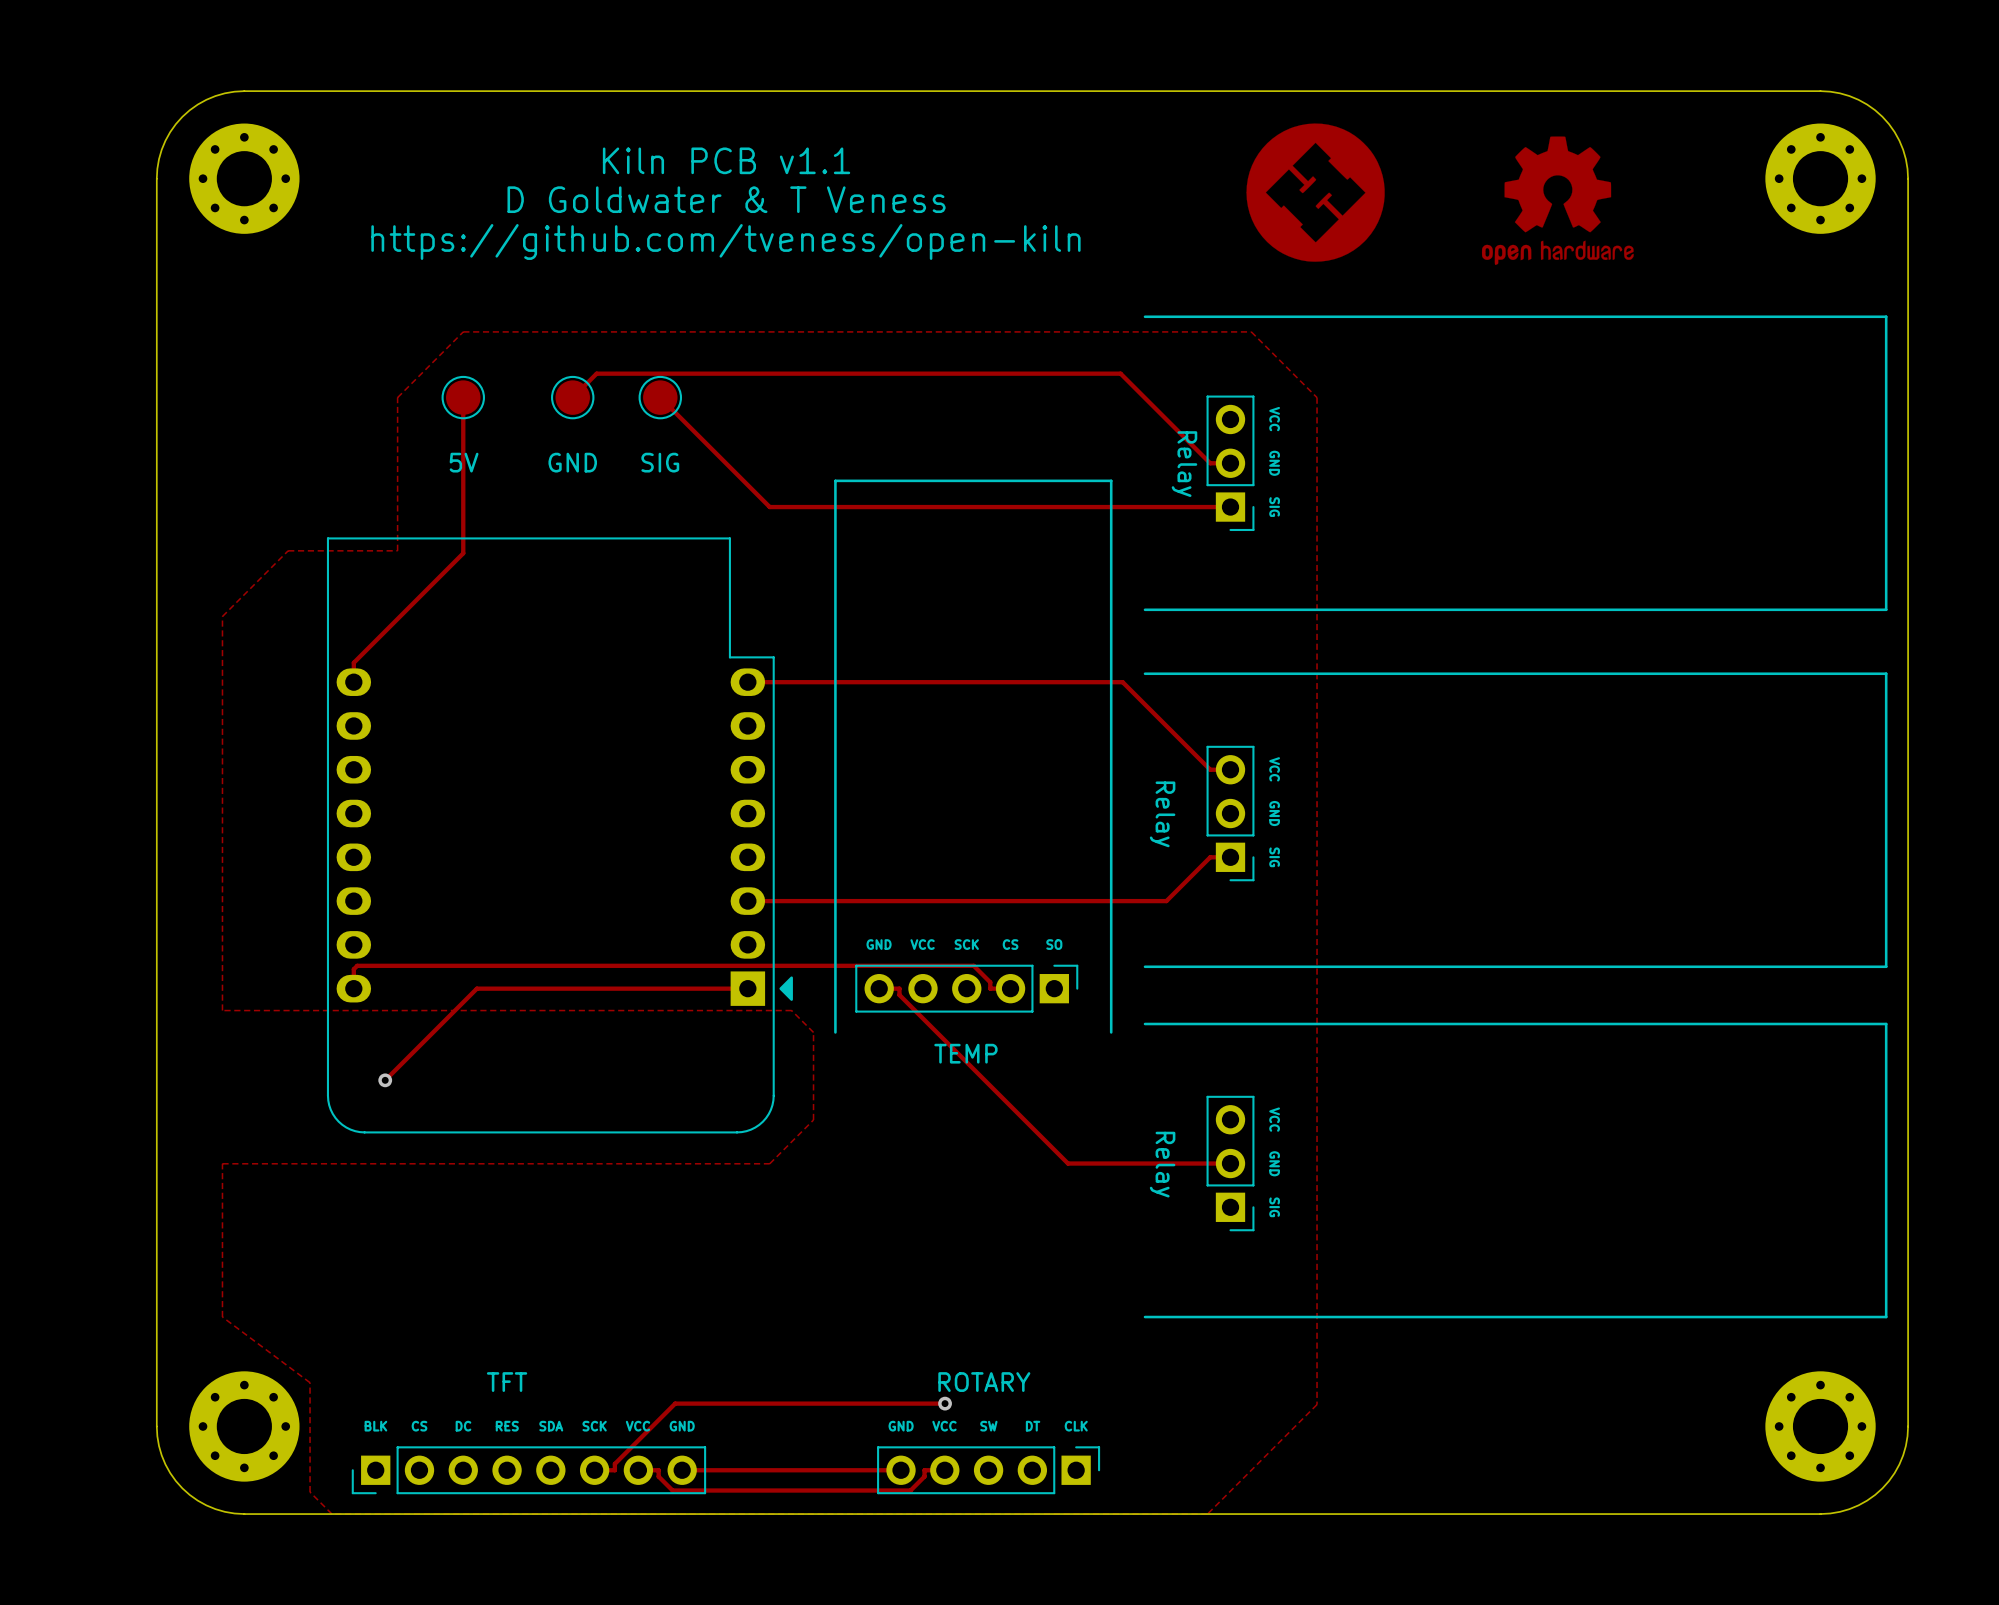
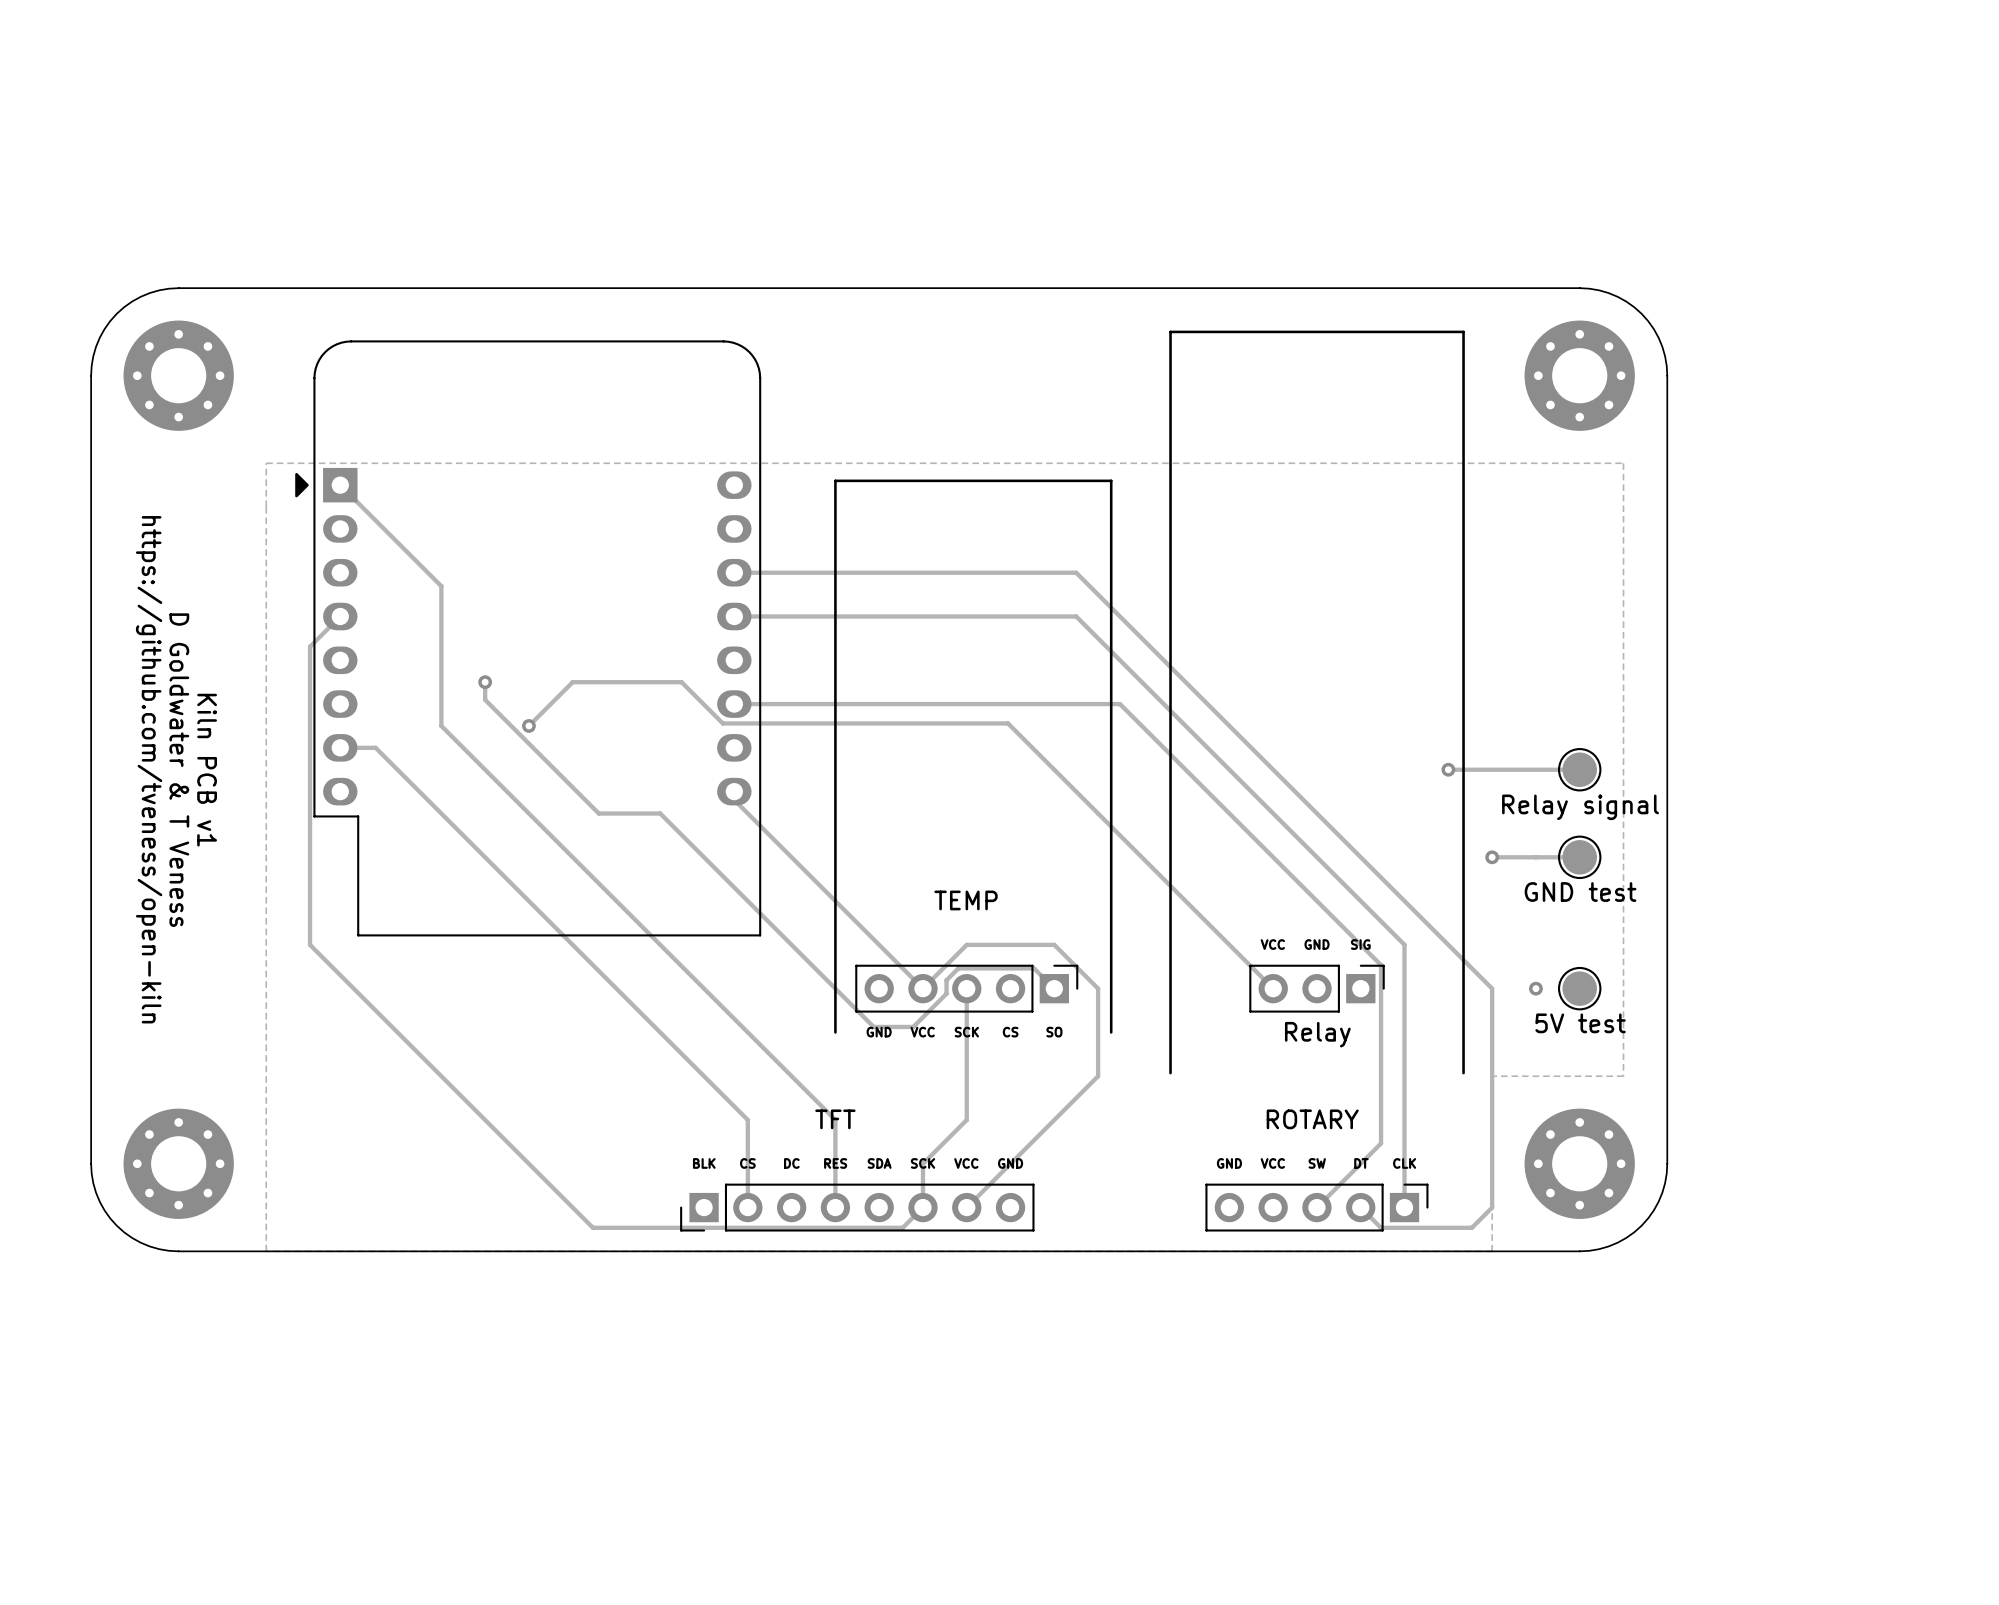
board edge: (244, 91) (1820, 91) (1849, 96) (1875, 110) (1888, 124) (1899, 140) (1905, 159) (1908, 178) (1908, 1426) (1903, 1455) (1888, 1481) (1875, 1494) (1858, 1505) (1840, 1511) (1820, 1514) (244, 1514) (215, 1509) (189, 1494) (175, 1481) (165, 1464) (158, 1445) (156, 1426) (156, 178) (158, 159) (165, 140) (182, 116) (206, 99) (224, 93) (244, 91) -> (178, 288) (149, 293) (132, 301) (116, 313) (99, 337) (93, 356) (91, 375) (91, 1163) (96, 1192) (104, 1210) (116, 1225) (132, 1237) (159, 1249) (178, 1251) (1579, 1251) (1599, 1249) (1617, 1242) (1641, 1225) (1653, 1210) (1665, 1183) (1667, 1163) (1667, 375) (1665, 356) (1658, 337) (1648, 321) (1626, 301) (1599, 290) (1579, 288) (178, 288)
drawing: [1246, 123, 1385, 262] -> none
drawing: [1481, 136, 1634, 265] -> none
text: Kiln PCB v1.1 (726, 160) -> none
part position: (244, 178) -> (178, 375)
part position: (1820, 178) -> (1579, 375)
text: D Goldwater & T Veness (726, 199) -> none
text: https://github.com/tveness/open-kiln (725, 241) -> none
line: (1145, 316) (1886, 316) (1886, 609) (1145, 609) -> none
zone outline: (463, 331) (397, 397) (397, 550) (288, 550) (222, 616) (222, 1010) (791, 1010) (813, 1032) (813, 1120) (769, 1163) (222, 1163) (222, 1317) (310, 1382) (310, 1492) (331, 1514) (1207, 1514) (1317, 1404) (1317, 397) (1251, 331) (463, 331) -> (266, 463) (266, 1251) (1492, 1251) (1492, 1076) (1623, 1076) (1623, 463) (266, 463)
track: (463, 397) (463, 553) (353, 662) (353, 682) -> none
part: 5V (463, 397) -> none
track: (572, 397) (596, 373) (1120, 373) (1210, 463) (1230, 463) -> none
part: GND (572, 397) -> none
track: (660, 397) (769, 507) (1230, 507) -> none
part: SIG (660, 397) -> none
text: VCC (1274, 419) -> none
part: Relay (1230, 463) -> none
text: GND (1274, 463) -> none
track: none -> (340, 485) (441, 586) (441, 725) (835, 1120) (835, 1207)
text: SIG (1274, 507) -> none
track: none -> (734, 572) (1076, 572) (1492, 988) (1492, 1207) (1471, 1227) (1380, 1227) (1360, 1207)
track: none -> (340, 616) (310, 646) (310, 944) (592, 1227) (902, 1227) (922, 1207) (922, 1163) (966, 1120) (966, 988)
track: none -> (734, 616) (1076, 616) (1404, 944) (1404, 1207)
line: (1145, 673) (1886, 673) (1886, 966) (1145, 966) -> none
track: none -> (485, 682) (485, 699) (598, 813) (660, 813) (873, 1026) (913, 1026) (946, 993) (946, 980) (958, 968) (1034, 968) (1054, 988)
via: none -> (485, 682)
track: (747, 682) (1122, 682) (1210, 769) (1230, 769) -> none
track: none -> (734, 704) (1120, 704) (1381, 965) (1381, 1143) (1316, 1207)
track: none -> (528, 725) (572, 682) (681, 682) (722, 723) (1008, 723) (1273, 988)
via: none -> (528, 725)
track: none -> (340, 747) (375, 747) (747, 1120) (747, 1207)
text: none -> https://github.com/tveness/open-kiln (149, 769)
text: VCC (1274, 769) -> none
track: none -> (1448, 769) (1579, 769)
via: none -> (1448, 769)
part: none -> Relay signal (1579, 769)
text: none -> D Goldwater & T Veness (179, 770)
text: none -> Kiln PCB v1 (207, 770)
track: none -> (734, 791) (734, 800) (922, 988) (966, 944) (1054, 944) (1098, 988) (1098, 1076) (966, 1207)
part: Relay (1230, 813) -> none
text rotation: 0° (1274, 813) -> 90° counterclockwise (1317, 944)
text position: GND (1274, 813) -> GND (1317, 944)
part rotation: 0° (559, 835) -> 180° (528, 638)
track: (1230, 857) (1210, 857) (1166, 901) (747, 901) -> none
text rotation: 0° (1274, 857) -> 90° counterclockwise (1360, 944)
text position: SIG (1274, 857) -> SIG (1360, 944)
track: none -> (1492, 857) (1579, 857)
via: none -> (1492, 857)
part: none -> GND test (1579, 857)
text position: GND (879, 944) -> GND (879, 1032)
text position: VCC (922, 944) -> VCC (922, 1032)
text position: SCK (966, 944) -> SCK (966, 1032)
text position: CS (1010, 944) -> CS (1010, 1032)
text position: SO (1054, 944) -> SO (1054, 1032)
text: none -> VCC (1272, 944)
track: (353, 988) (353, 969) (357, 965) (973, 965) (990, 982) (990, 988) (1010, 988) -> none
track: (747, 988) (476, 988) (385, 1080) -> none
track: (879, 988) (899, 988) (899, 994) (1068, 1163) (1230, 1163) -> none
part: none -> Relay (1317, 988)
via: none -> (1535, 988)
part: none -> 5V test (1579, 988)
line: (1145, 1023) (1886, 1023) (1886, 1317) (1145, 1317) -> none
part value position: TEMP (965, 1053) -> TEMP (966, 900)
line: none -> (1170, 1073) (1170, 331) (1463, 331) (1463, 1073)
via: (385, 1080) -> none
text: VCC (1274, 1119) -> none
text: none -> CS (747, 1163)
text: none -> SCK (922, 1163)
text: none -> VCC (966, 1163)
text: none -> GND (1010, 1163)
text: none -> GND (1229, 1163)
part: Relay (1230, 1163) -> none
text: GND (1274, 1163) -> VCC (1272, 1163)
text: SIG (1274, 1207) -> none
track: (945, 1403) (675, 1403) (614, 1463) (614, 1470) (594, 1470) -> none
via: (945, 1403) -> none
part position: (244, 1426) -> (178, 1163)
text position: BLK (375, 1426) -> BLK (704, 1163)
text: CS (419, 1426) -> none
text position: DC (463, 1426) -> DC (791, 1163)
text position: RES (507, 1426) -> RES (835, 1163)
text position: SDA (551, 1426) -> SDA (879, 1163)
text: SCK (594, 1426) -> none
text: VCC (637, 1426) -> none
text: GND (682, 1426) -> none
text: GND (901, 1426) -> none
text: VCC (944, 1426) -> none
text position: SW (988, 1426) -> SW (1317, 1163)
text position: DT (1033, 1426) -> DT (1361, 1163)
text position: CLK (1076, 1426) -> CLK (1404, 1163)
part position: (1820, 1426) -> (1579, 1163)
part position: (528, 1470) -> (857, 1207)
track: (638, 1470) (658, 1470) (658, 1476) (672, 1490) (910, 1490) (924, 1476) (924, 1470) (944, 1470) -> none
track: (682, 1470) (901, 1470) -> none
part position: (988, 1470) -> (1316, 1207)

